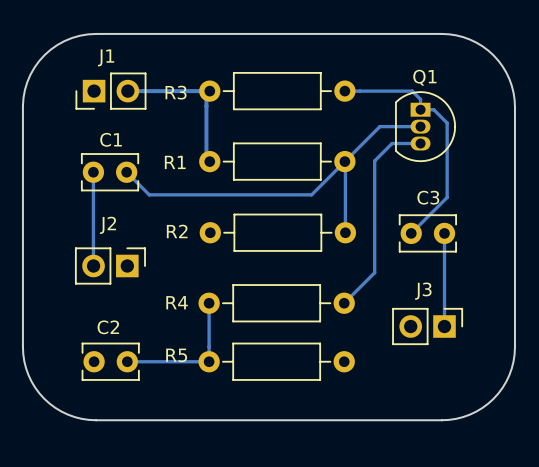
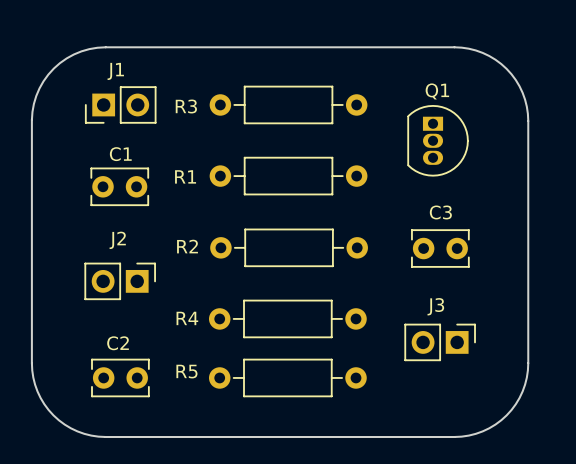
bottom track: (127, 91) (206, 91) (206, 160) -> none
bottom track: (344, 91) (412, 91) (420, 99) (420, 109) (433, 109) (447, 123) (447, 197) (411, 233) -> none
bottom track: (420, 126) (379, 126) (311, 194) (149, 194) (126, 172) -> none
bottom track: (420, 143) (392, 143) (374, 160) (374, 272) (344, 303) -> none
bottom track: (344, 161) (345, 232) -> none
bottom track: (93, 172) (93, 265) -> none
bottom track: (444, 233) (444, 326) -> none
bottom track: (209, 303) (209, 361) (127, 361) -> none

